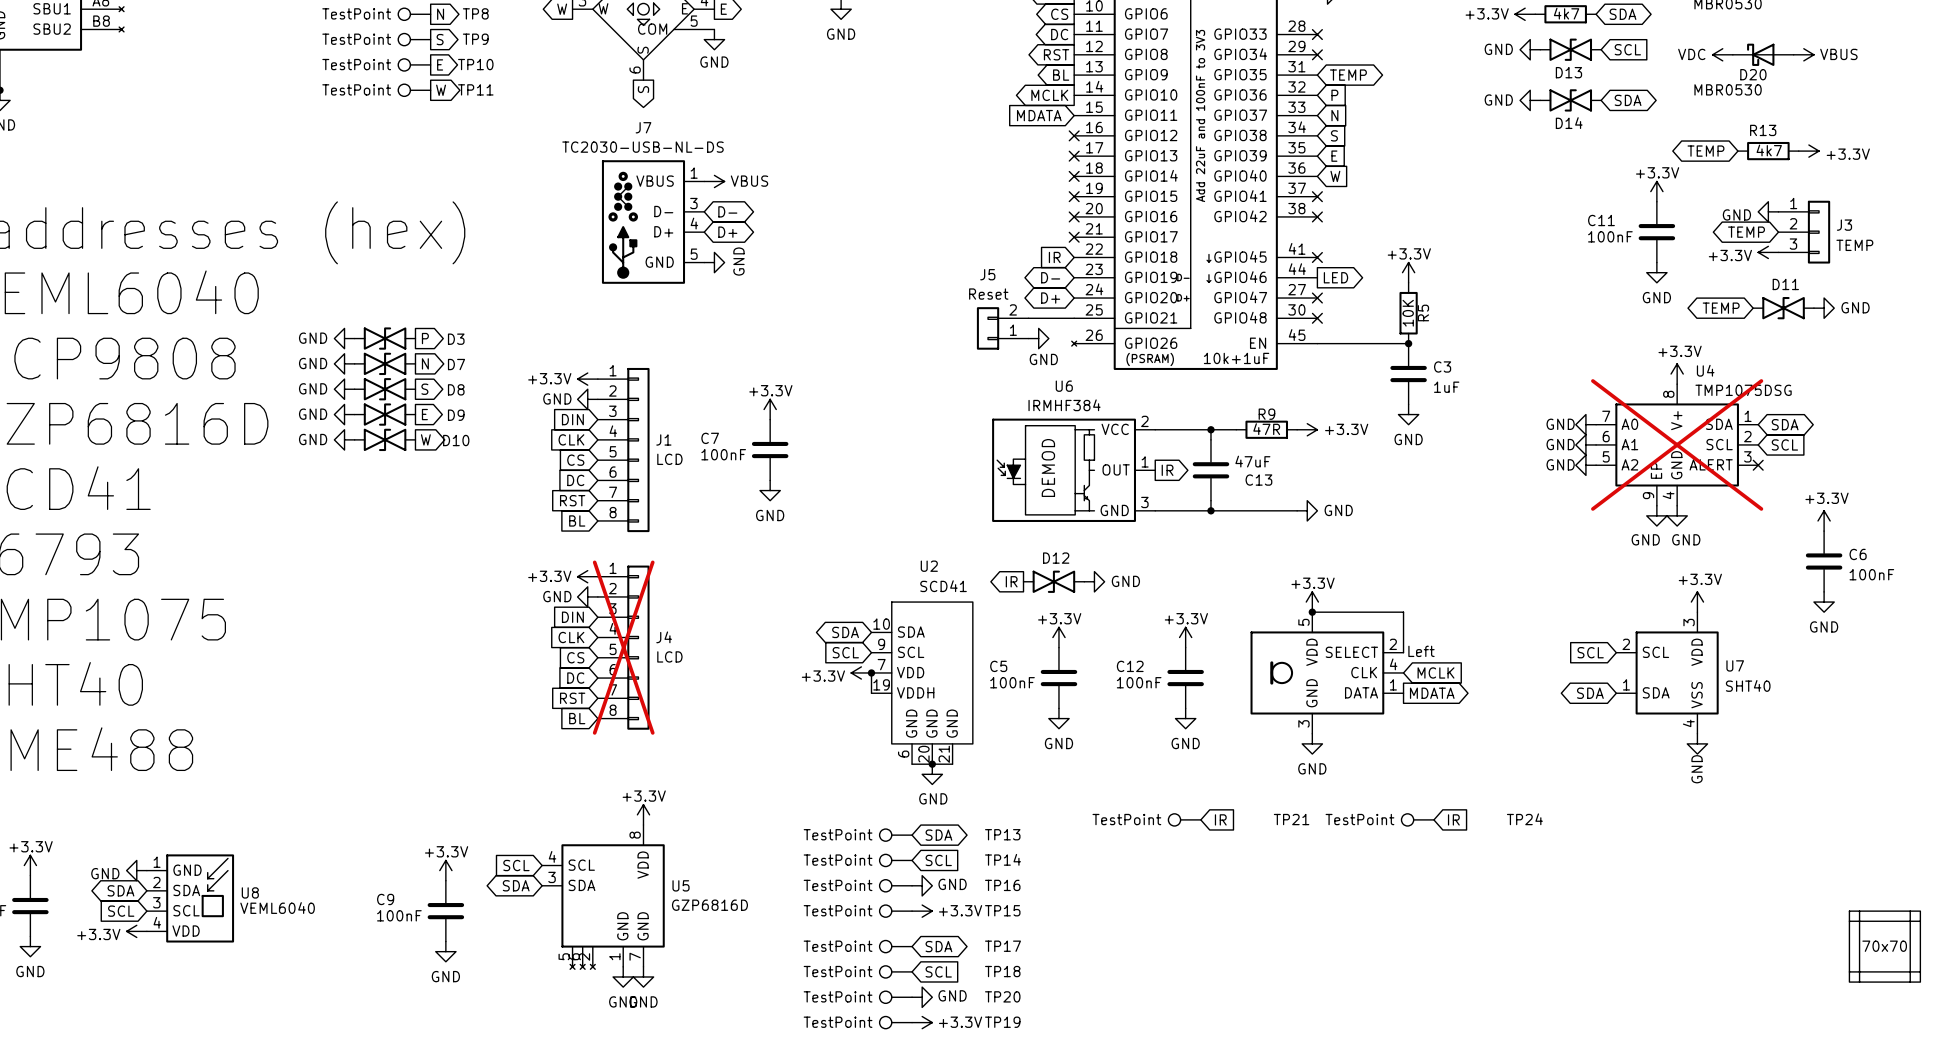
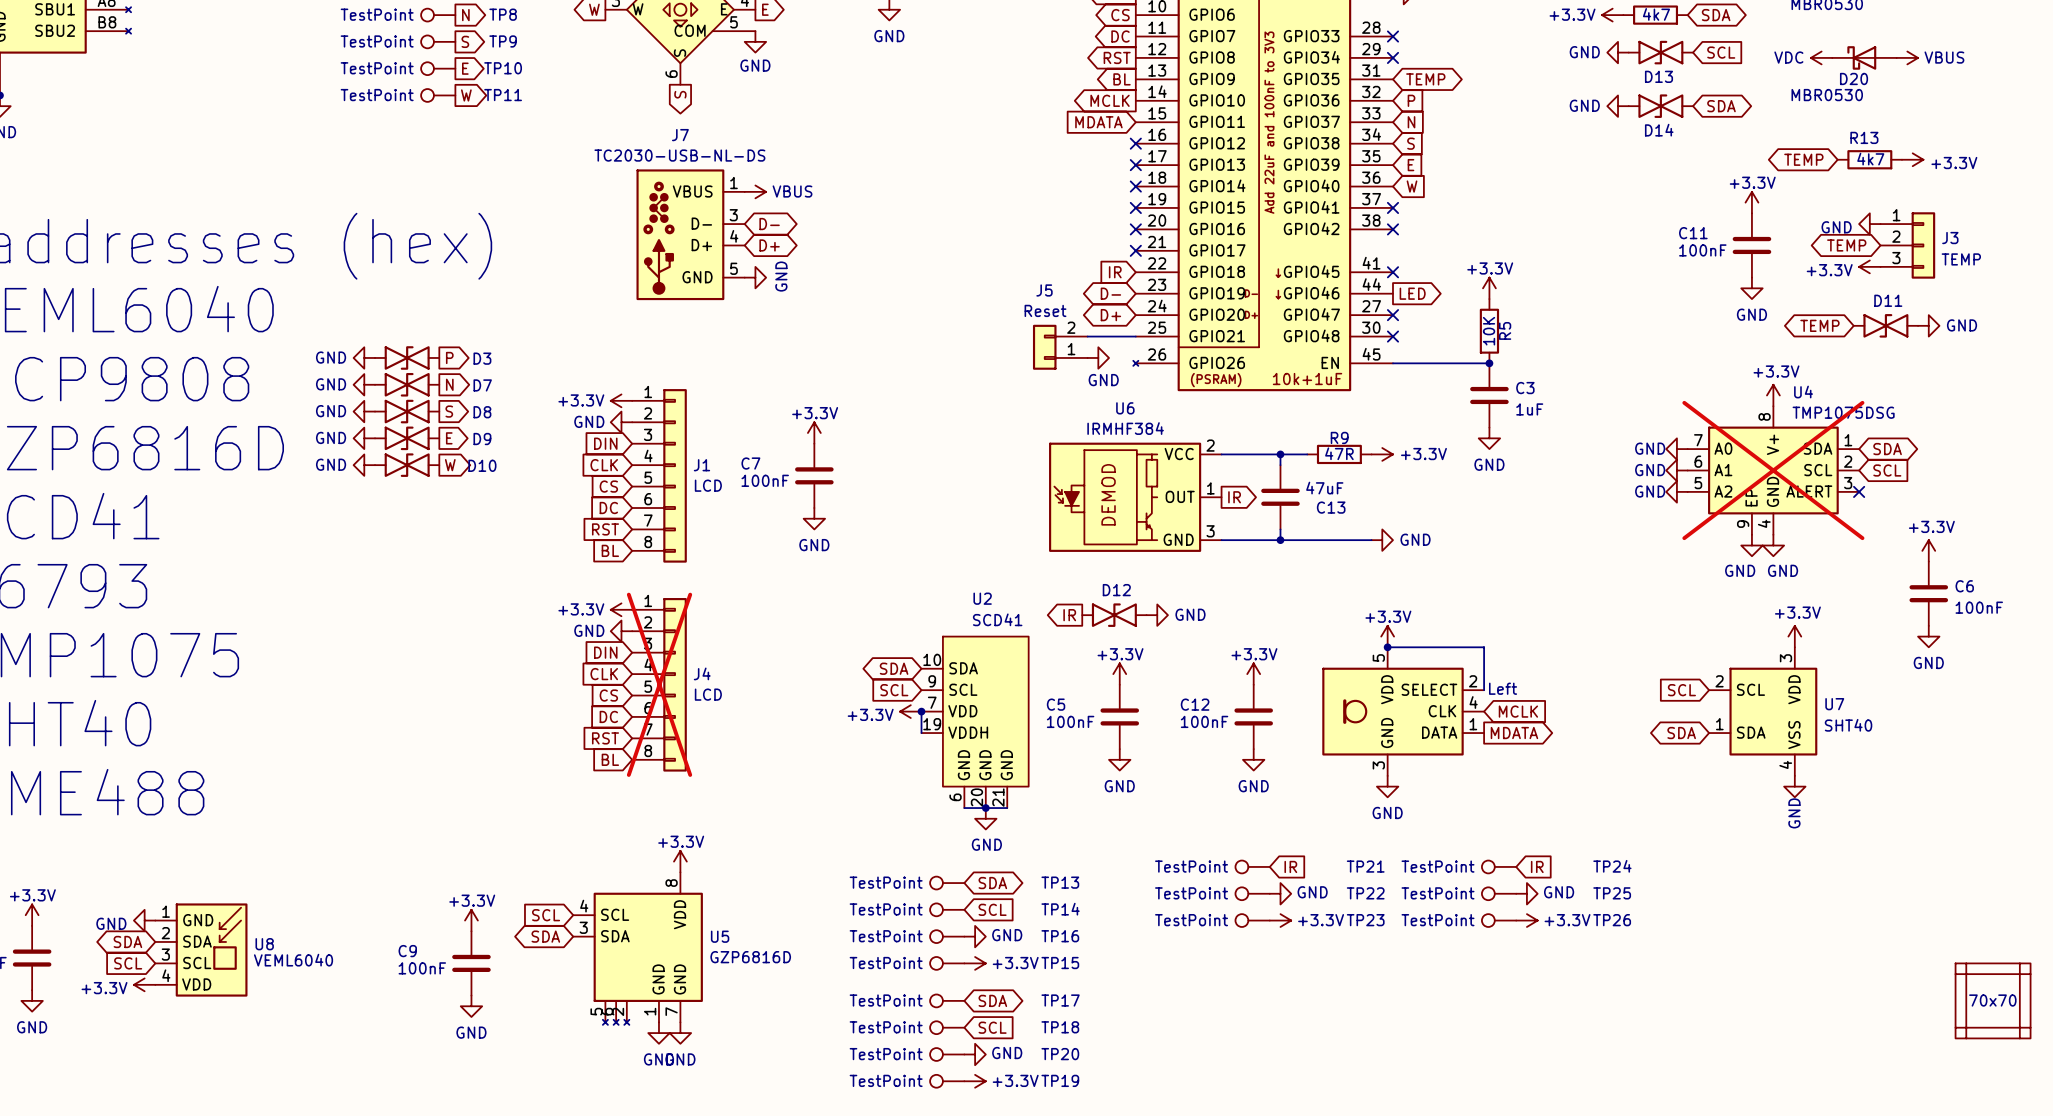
TP22: none -> TestPoint (1252, 893)
power symbol: none -> GND (1280, 893)
TP25: none -> TestPoint (1499, 893)
power symbol: none -> GND (1526, 893)
TP23: none -> TestPoint (1252, 920)
power symbol: none -> +3.3V (1280, 920)
TP26: none -> TestPoint (1499, 920)
power symbol: none -> +3.3V (1526, 920)

